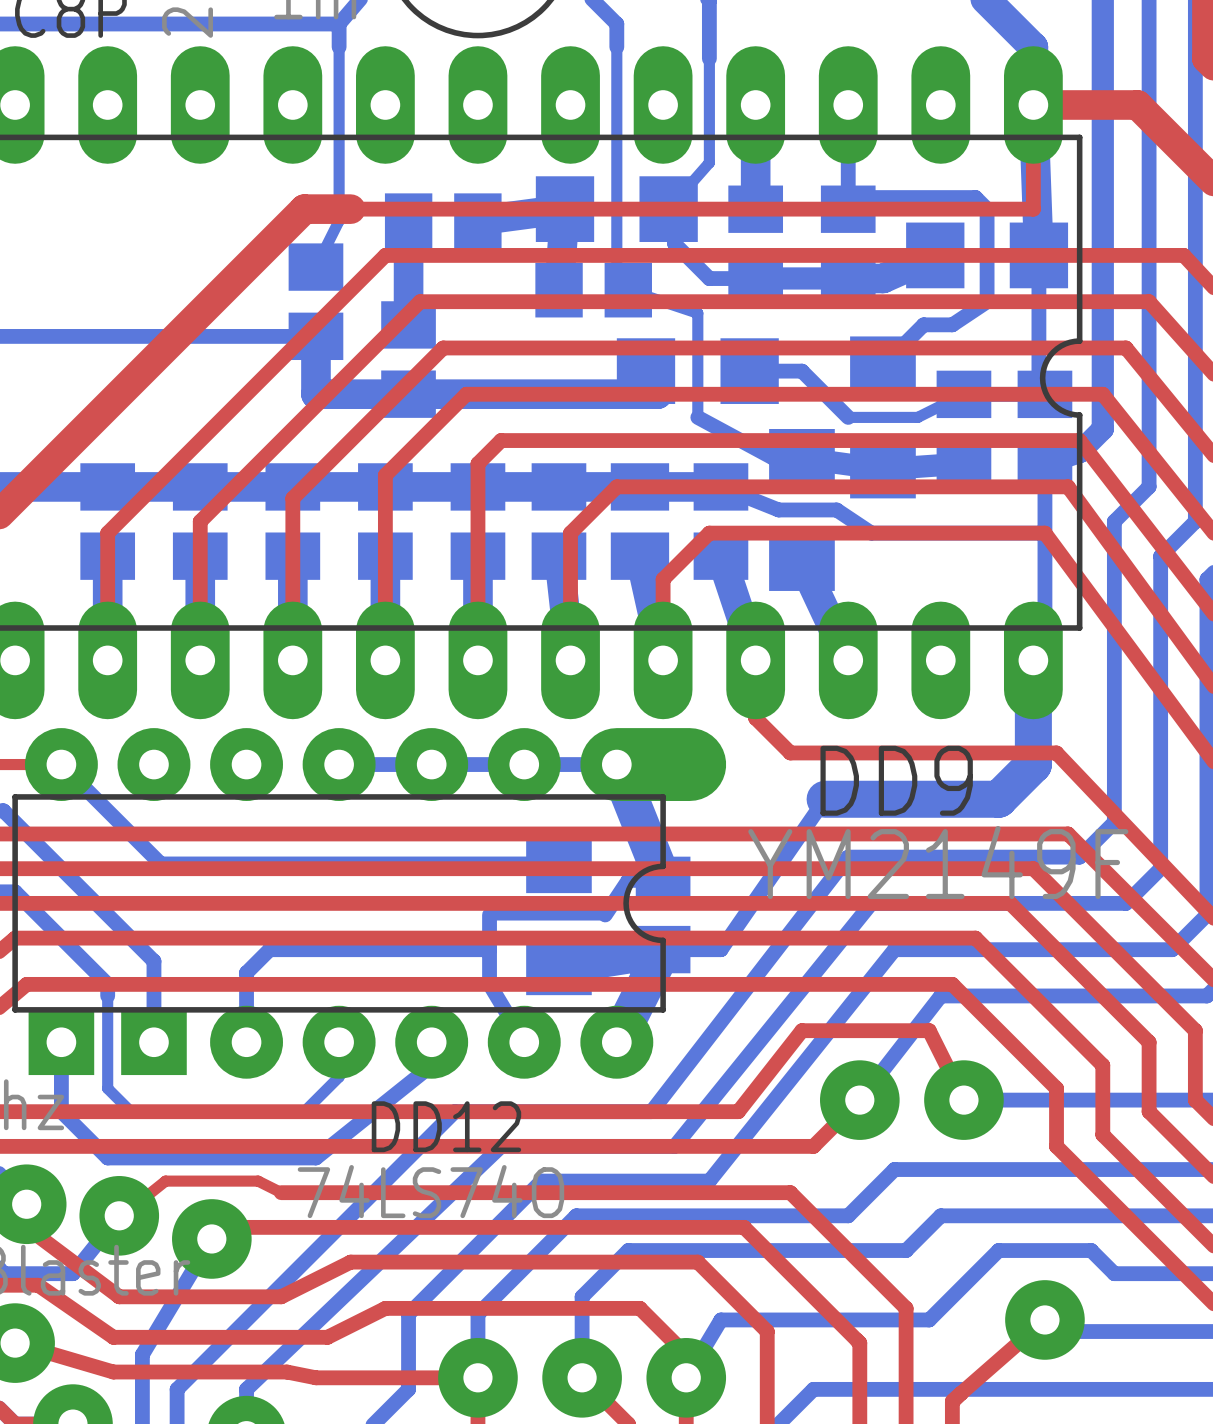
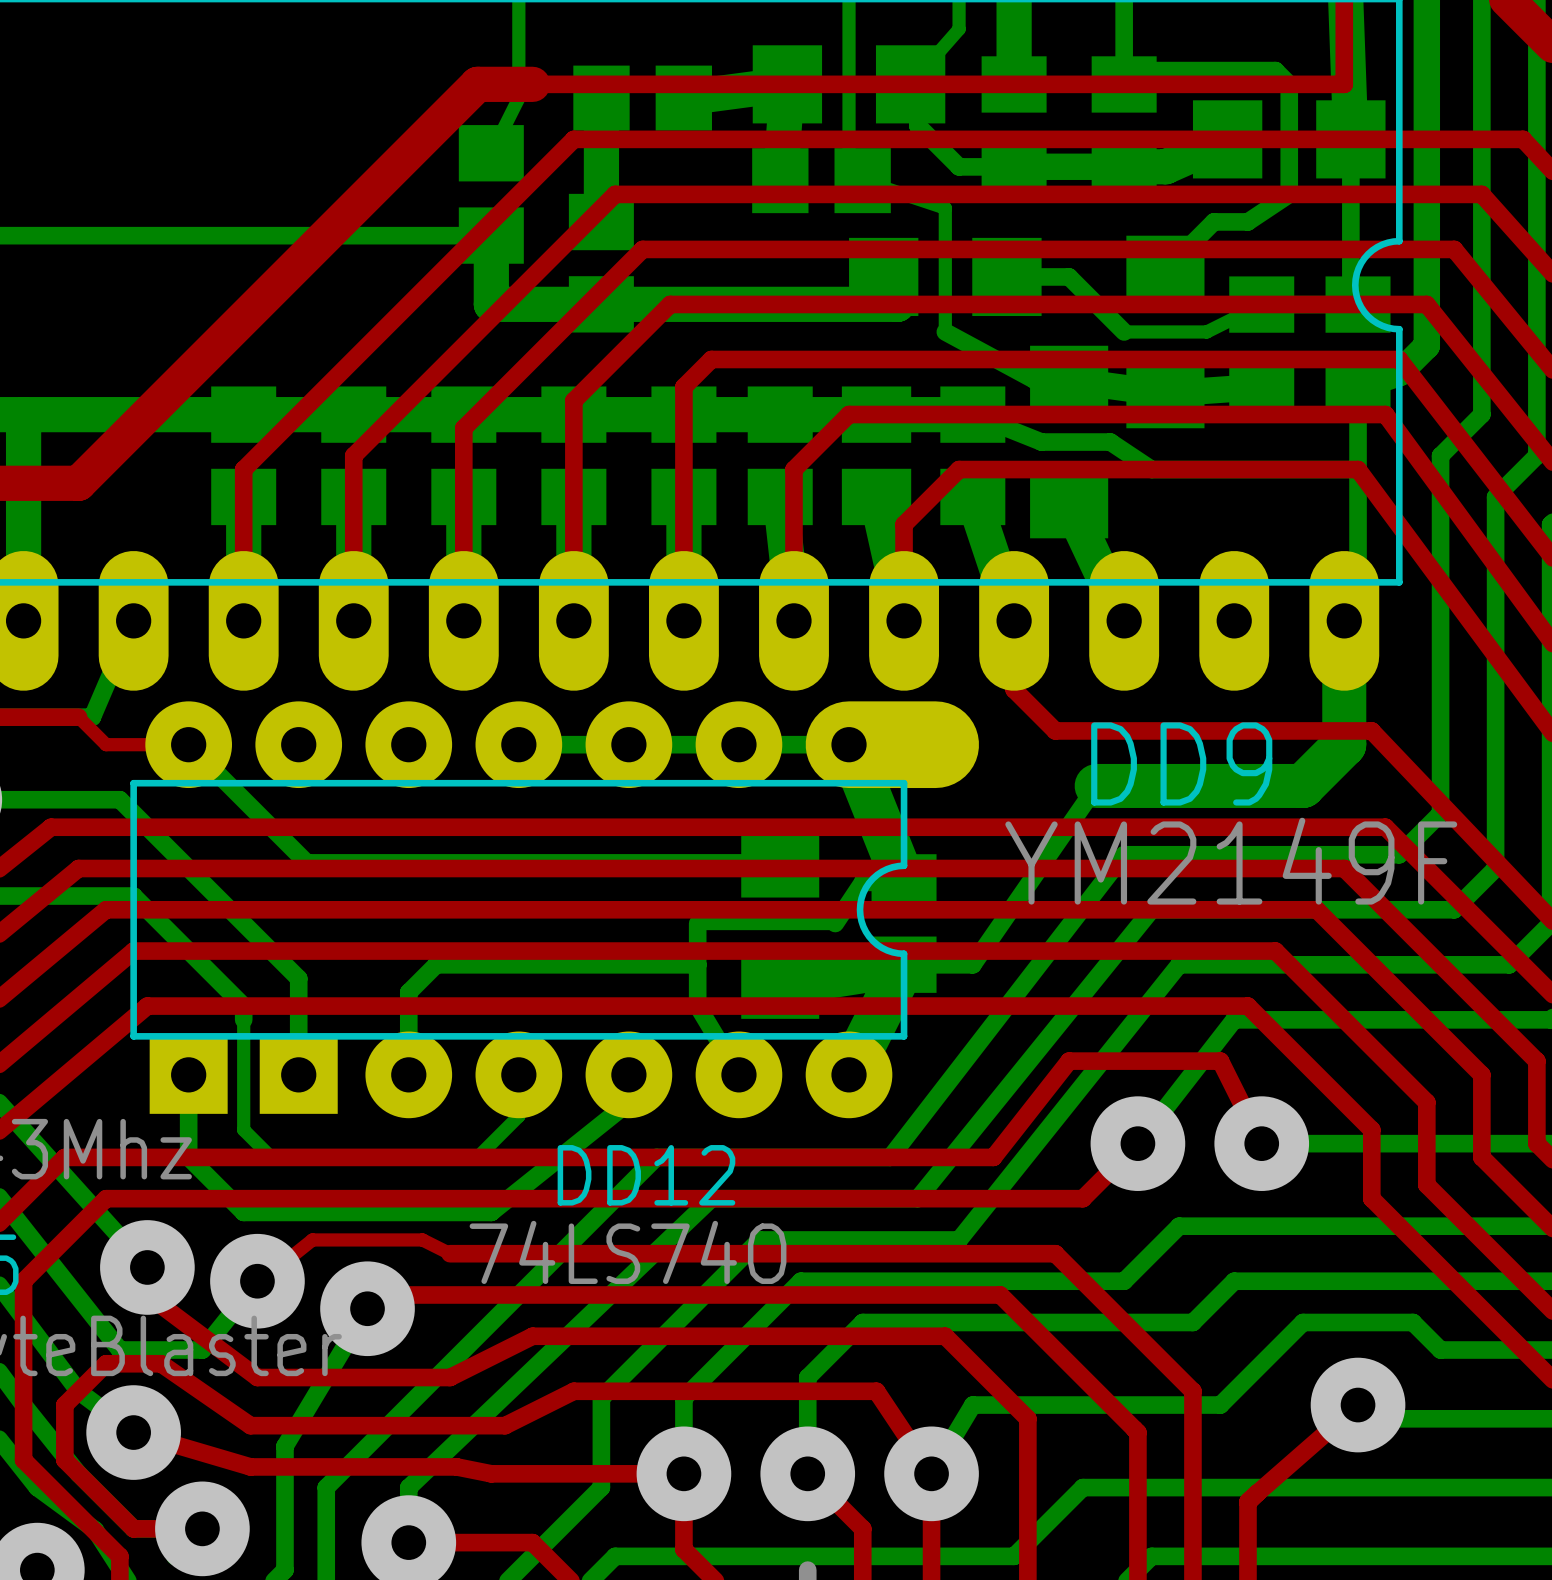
top track: (639, 1308) (686, 1354) (686, 1377) -> (876, 1391) (931, 1473)

